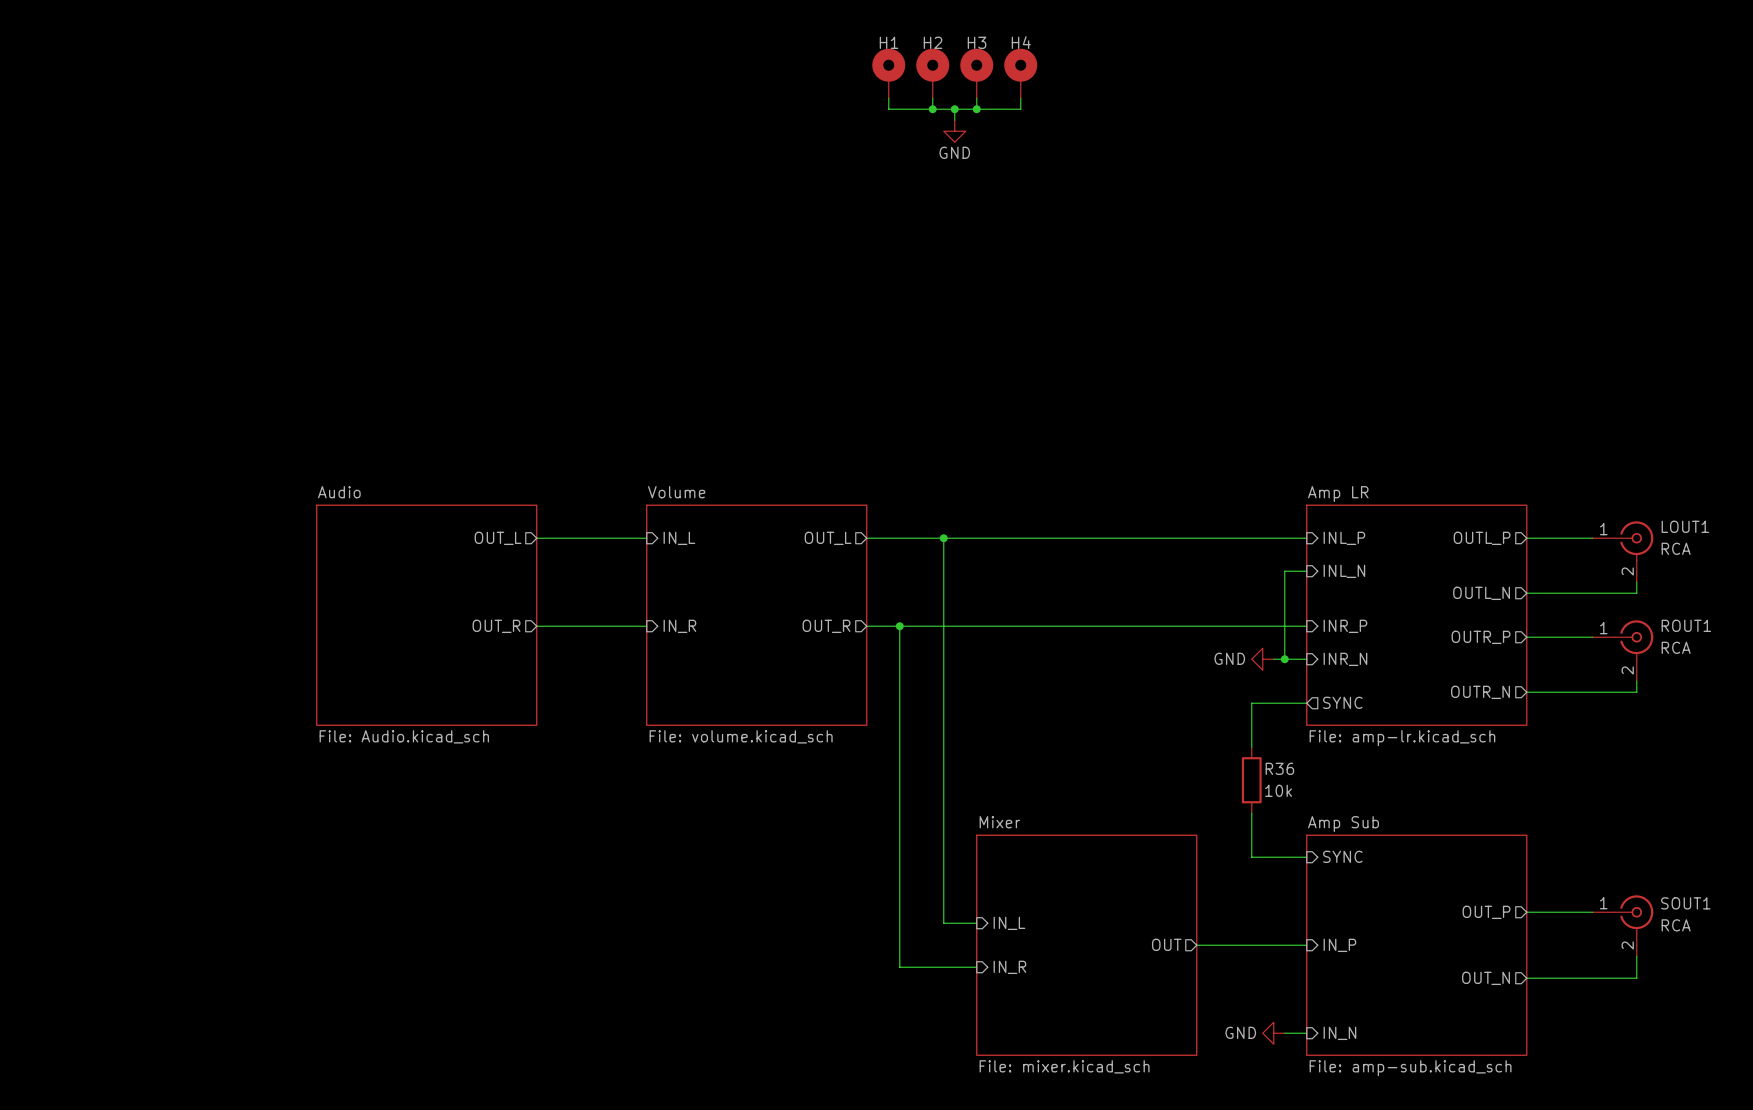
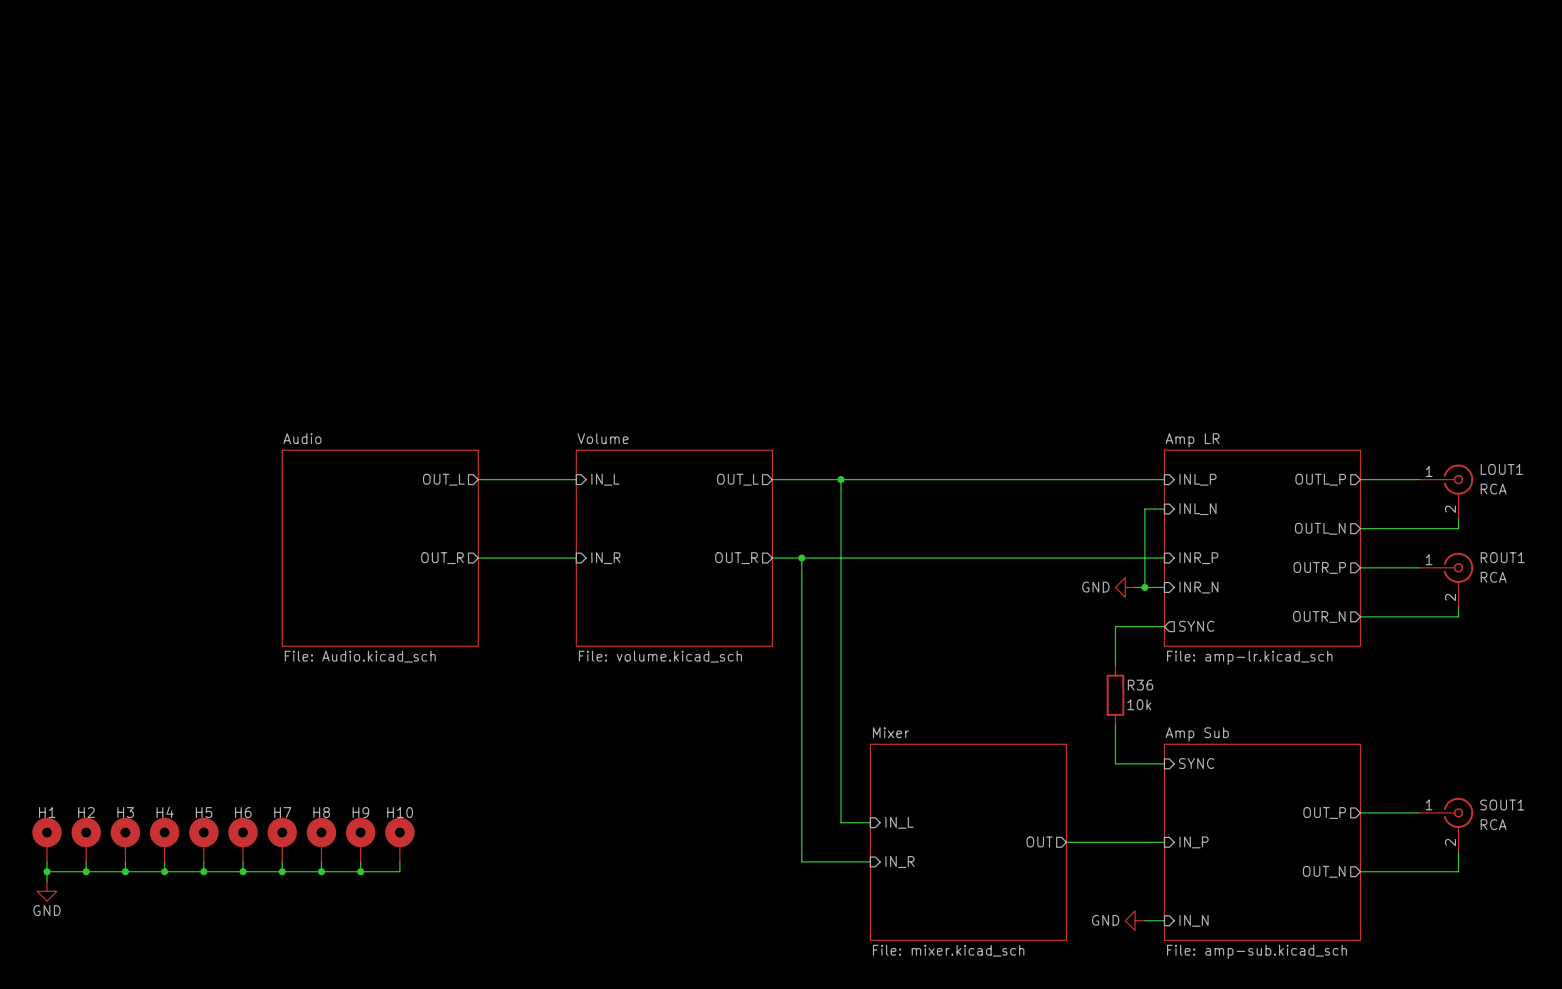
H1 position: (888, 73) -> (46, 839)
H2 position: (932, 73) -> (86, 839)
H3 position: (976, 73) -> (125, 839)
H4 position: (1020, 73) -> (164, 839)
wire: (888, 98) (888, 109) (1020, 109) (1020, 98) -> none
wire: (932, 98) (932, 109) -> none
wire: (976, 98) (976, 109) -> none
junction: (932, 109) -> none
wire: (954, 109) (954, 120) -> none
junction: (954, 109) -> none
junction: (976, 109) -> none
power symbol: GND (954, 131) -> none
H5: none -> (203, 839)
H6: none -> (243, 839)
H7: none -> (282, 839)
H8: none -> (321, 839)
H9: none -> (360, 839)
H10: none -> (399, 839)
wire: none -> (46, 861) (46, 881)
wire: none -> (86, 861) (86, 871)
wire: none -> (125, 861) (125, 871)
wire: none -> (164, 861) (164, 871)
wire: none -> (203, 861) (203, 871)
wire: none -> (243, 861) (243, 871)
wire: none -> (282, 861) (282, 871)
wire: none -> (321, 861) (321, 871)
wire: none -> (360, 861) (360, 871)
wire: none -> (399, 861) (399, 871) (46, 871)
junction: none -> (46, 871)
junction: none -> (86, 871)
junction: none -> (125, 871)
junction: none -> (164, 871)
junction: none -> (203, 871)
junction: none -> (243, 871)
junction: none -> (282, 871)
junction: none -> (321, 871)
junction: none -> (360, 871)
power symbol: none -> GND (46, 891)

